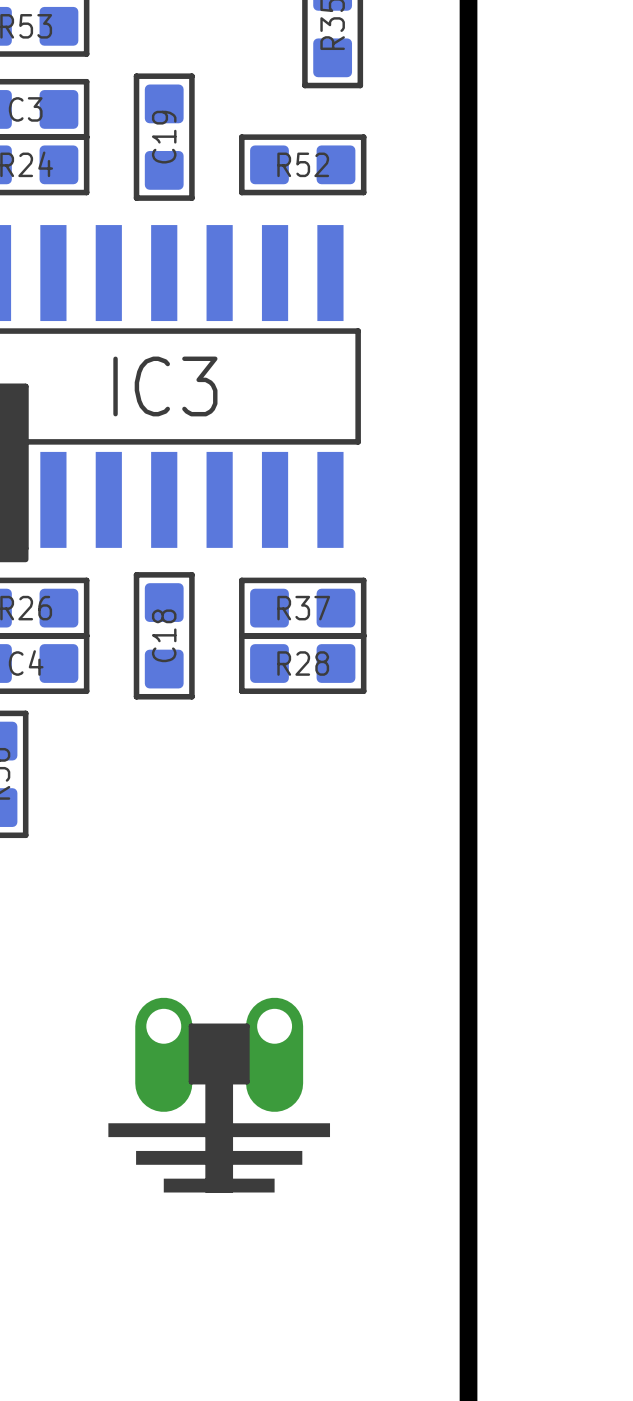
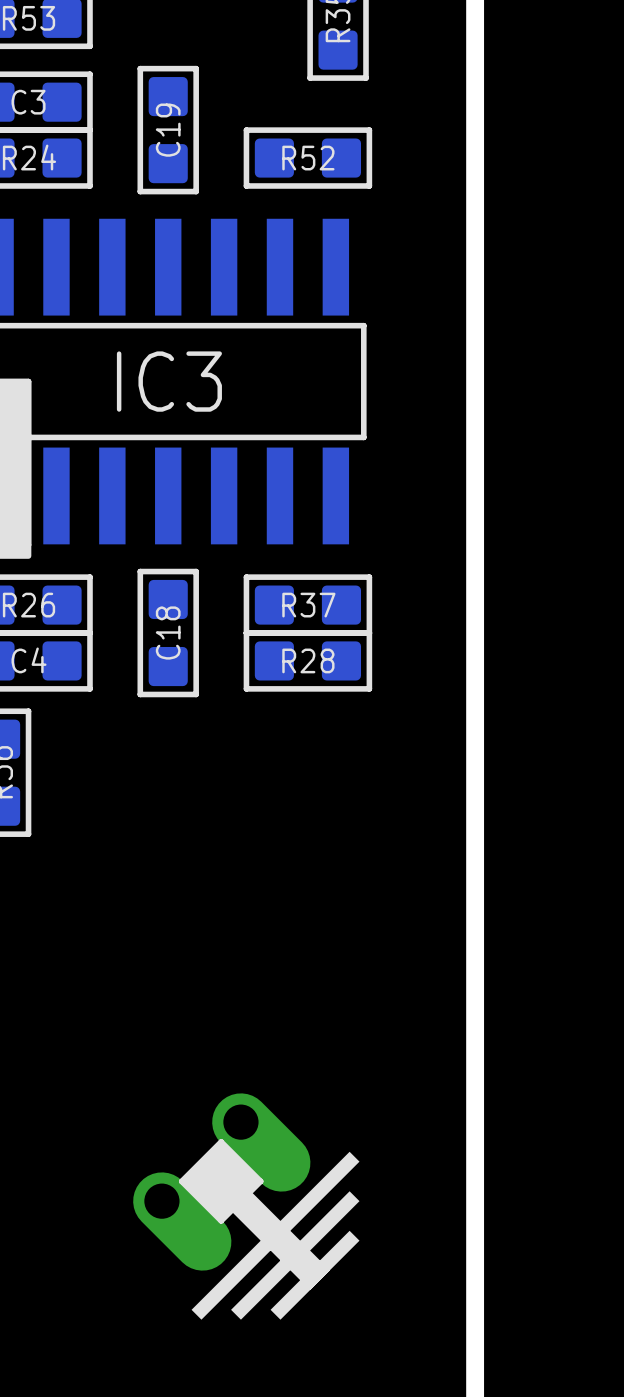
part: (219, 1095) -> none
part: none -> (246, 1206)

